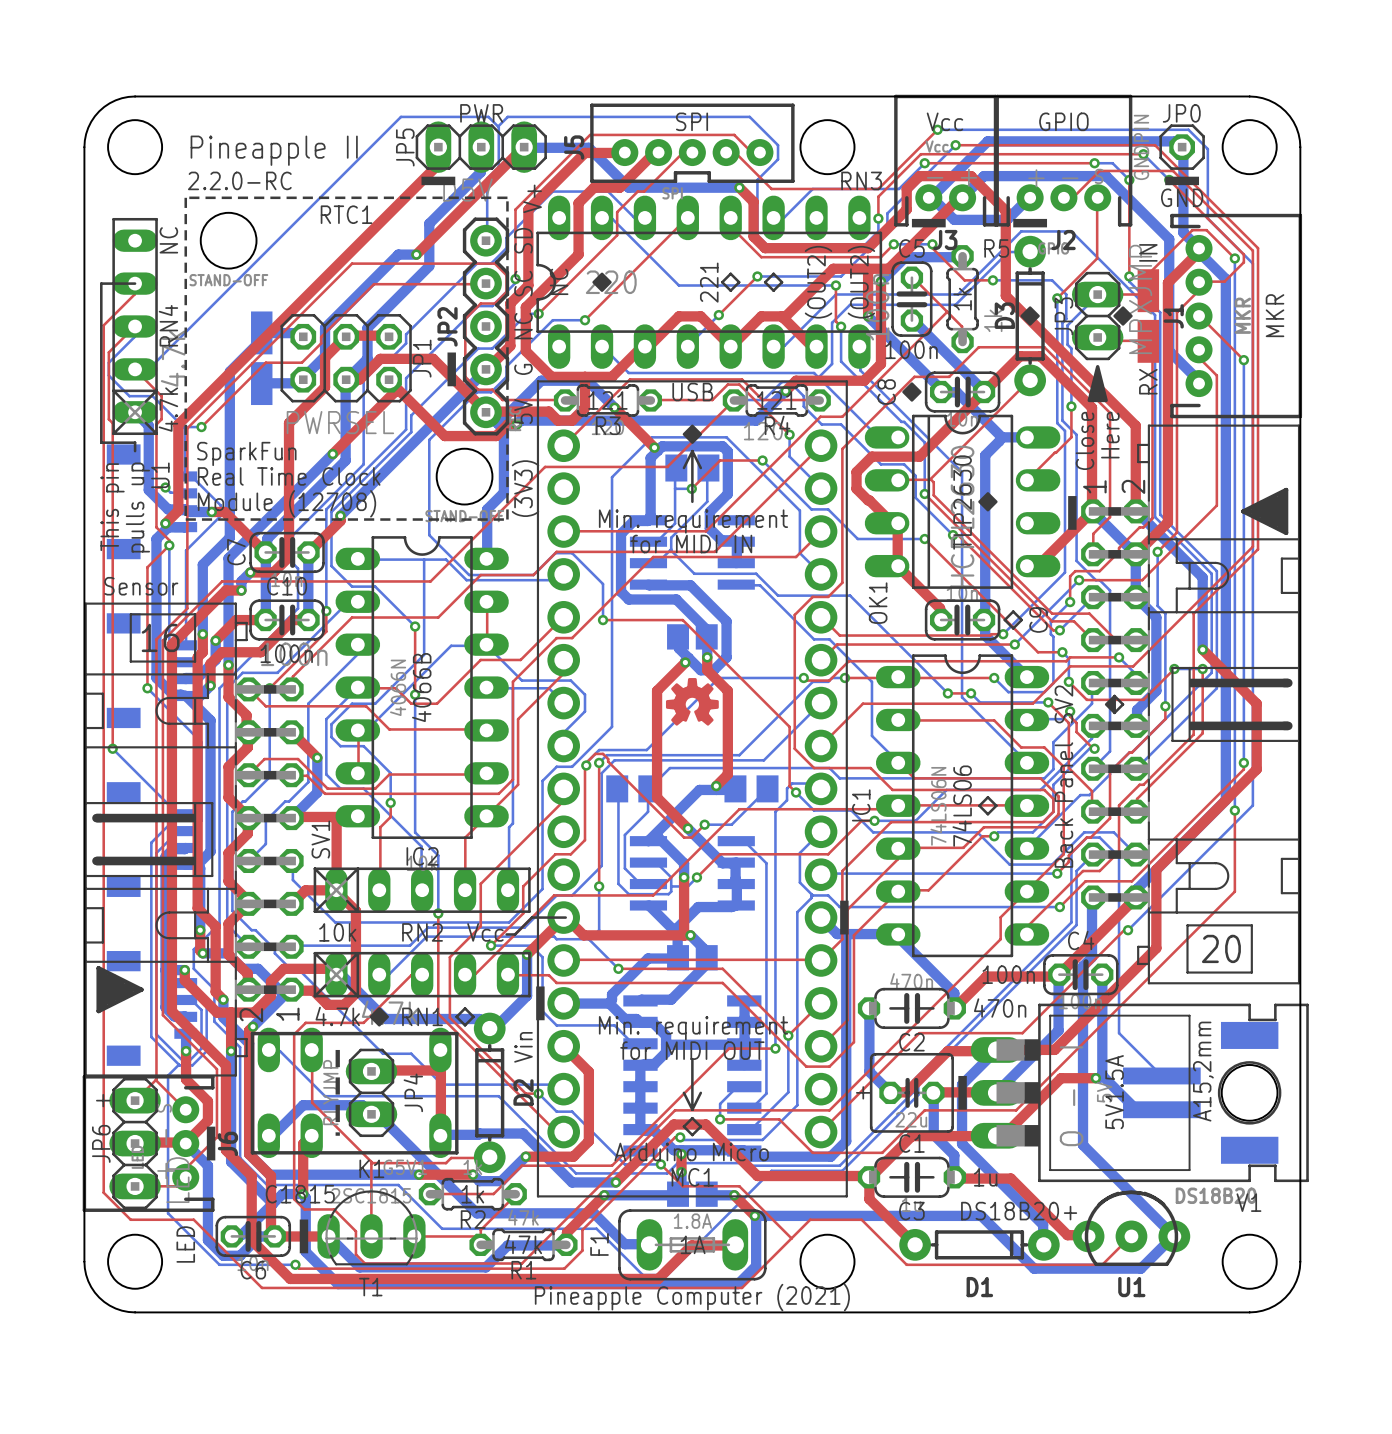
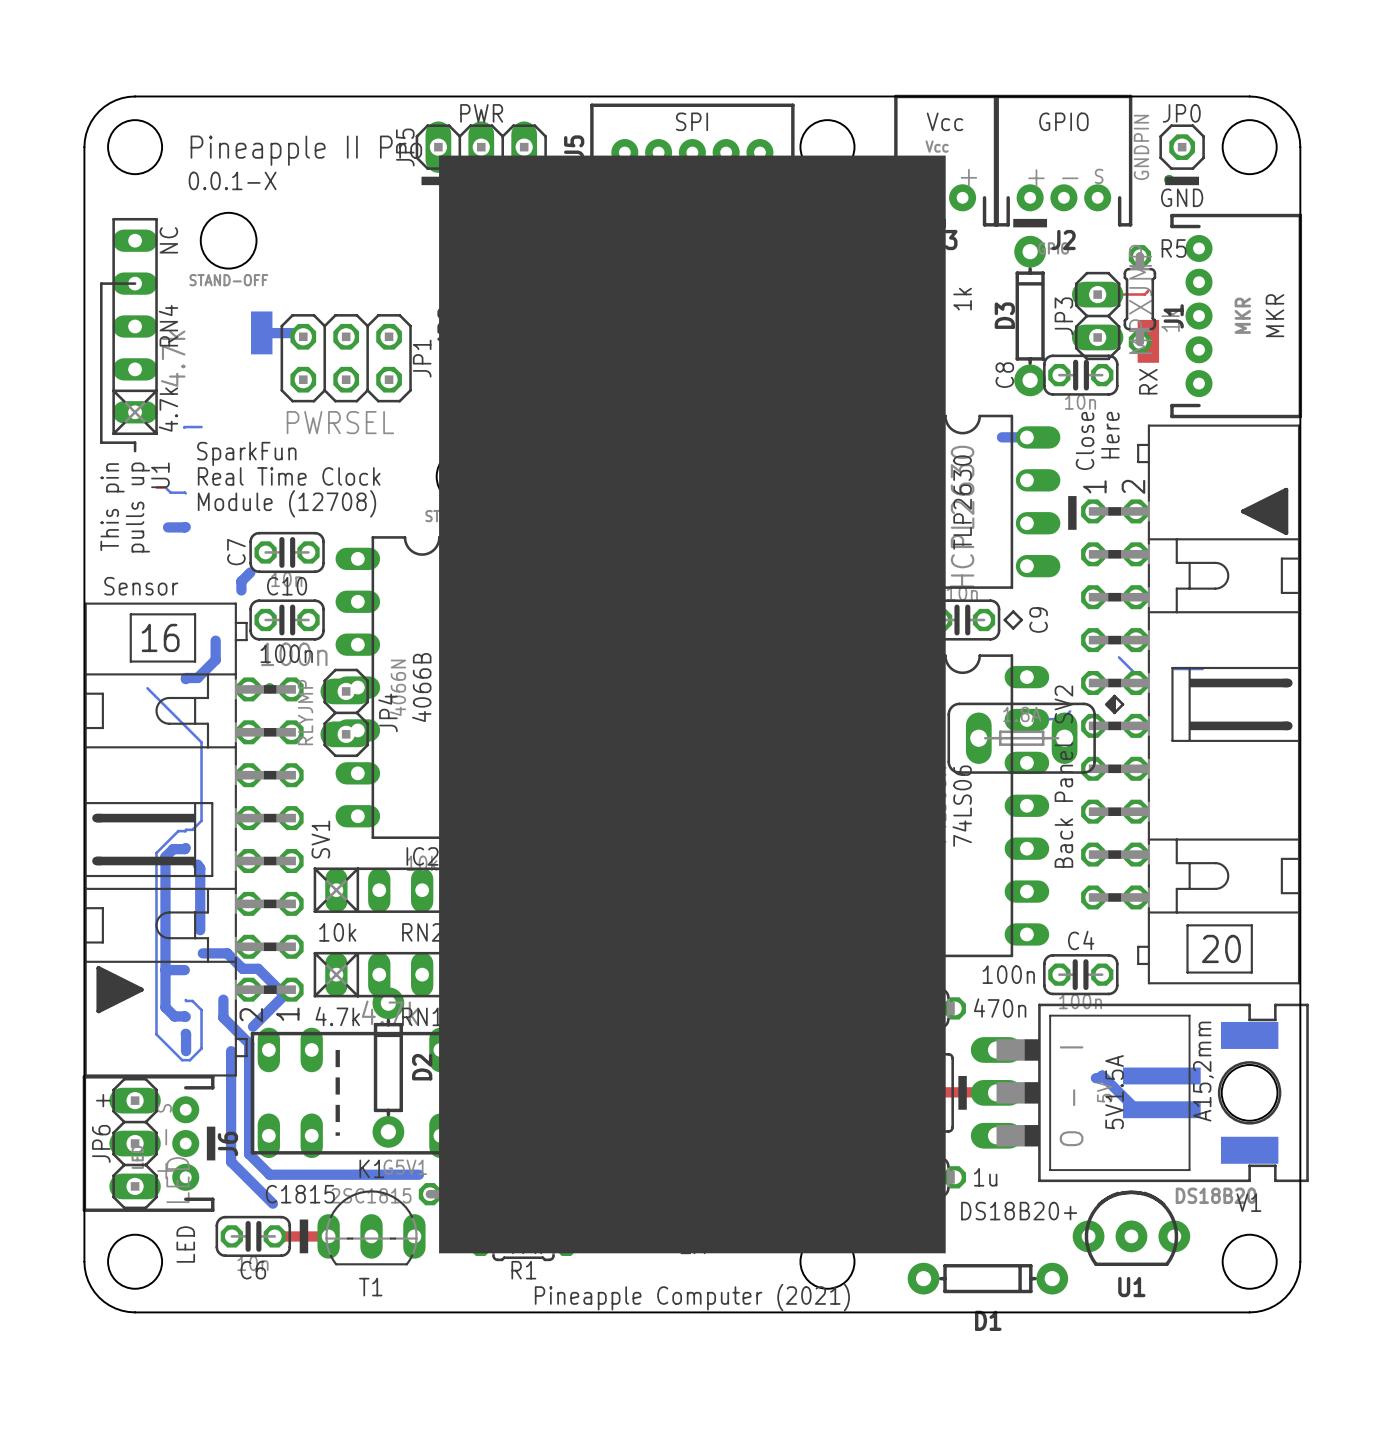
bottom track: (498, 126) (507, 116) (749, 116) (778, 145) (778, 159) (757, 179) (757, 235) (766, 244) (865, 244) (878, 231) (878, 218) -> none
top track: (937, 129) (878, 188) (771, 188) (735, 152) (726, 152) -> none
bottom track: (937, 129) (1188, 129) (1207, 149) (1207, 218) (1252, 263) (1252, 805) (1128, 930) -> none
via: (937, 129) -> none
top track: (955, 145) (1155, 145) (1258, 248) (1258, 549) (1193, 613) (1193, 734) (1143, 784) (1139, 784) (1119, 805) (1119, 851) (1099, 871) (1083, 871) (1027, 926) (1026, 934) -> none
bottom track: (955, 145) (887, 213) (887, 230) (841, 276) (757, 276) -> none
via: (955, 145) -> none
top track: (438, 147) (438, 164) (178, 424) (178, 510) (165, 523) -> none
bottom track: (481, 147) (480, 172) (429, 223) (429, 266) (367, 327) (367, 358) (346, 379) (345, 460) (267, 539) (265, 620) -> none
top track: (524, 147) (416, 254) -> none
bottom track: (524, 147) (588, 147) (628, 187) (739, 187) -> none
text: Pineapple II (274, 150) -> Pineapple II Pro (306, 150)
top track: (624, 152) (585, 152) (528, 209) (528, 285) (510, 303) (510, 345) (486, 369) -> none
top track: (658, 152) (654, 152) (619, 187) (594, 187) (578, 203) (578, 254) (525, 307) (525, 351) (551, 376) (612, 376) (640, 348) (649, 345) (678, 316) (700, 316) (730, 346) (761, 316) (781, 316) (811, 345) (816, 346) -> none
top track: (692, 152) (682, 152) (644, 191) (637, 191) (617, 212) (617, 235) (538, 313) -> none
top track: (759, 152) (751, 151) (734, 134) (590, 134) (515, 209) (515, 279) -> none
top track: (1143, 154) (920, 154) (878, 196) (878, 218) -> none
bottom track: (1143, 154) (1169, 179) -> none
via: (1143, 154) -> none
drawing: none -> [439, 155, 946, 1254]
top track: (924, 163) (1094, 163) -> none
bottom track: (924, 163) (898, 188) (812, 188) (784, 217) (773, 217) -> none
via: (924, 163) -> none
bottom track: (1094, 163) (1112, 163) (1129, 179) -> none
via: (1094, 163) -> none
top track: (1129, 179) (1129, 276) -> none
via: (1129, 179) -> none
top track: (1169, 179) (1243, 254) (1243, 262) (1224, 281) (1199, 282) (1198, 290) (1176, 312) (1176, 532) (1157, 551) -> none
text: 2.2.0-RC (239, 180) -> 0.0.1-X (232, 180)
top track: (739, 187) (753, 201) (753, 236) (765, 248) (868, 248) (906, 209) (906, 188) (919, 176) (971, 176) (1005, 210) (1005, 295) (1135, 425) (1136, 511) -> none
via: (739, 187) -> none
line: (185, 197) (507, 197) (507, 519) (185, 519) (185, 197) -> none
top track: (962, 197) (959, 197) (888, 268) (833, 268) (783, 318) -> none
bottom track: (962, 197) (983, 176) (1106, 176) (1169, 239) (1169, 351) (1198, 380) (1198, 383) -> none
bottom track: (1030, 197) (1007, 219) (954, 219) (932, 197) (928, 197) (935, 194) (987, 141) (1175, 141) (1183, 147) (1183, 232) (1198, 248) (1200, 253) (1225, 279) (1225, 800) (1137, 889) (1136, 897) -> none
top track: (1063, 197) (1074, 196) (1099, 170) (1173, 170) (1252, 250) (1252, 546) (1133, 666) (1070, 666) (1032, 703) (862, 703) (821, 745) -> none
top track: (1097, 197) (1097, 258) (1057, 298) -> none
text: RTC1 (346, 214) -> none
bottom track: (602, 217) (612, 218) (678, 285) (835, 285) -> none
bottom track: (644, 217) (633, 217) (608, 191) (552, 191) (506, 237) (506, 248) (491, 263) (476, 263) (406, 334) (406, 343) (386, 362) (381, 362) (363, 380) (363, 464) (292, 535) (292, 563) (298, 568) (298, 608) (219, 688) (219, 923) (193, 949) (193, 968) (214, 989) (214, 1021) (240, 1047) (240, 1157) (267, 1185) (398, 1185) (442, 1228) (596, 1228) (642, 1275) (667, 1275) (771, 1170) (842, 1170) (918, 1094) (918, 1083) (1076, 925) (1076, 871) (1093, 854) -> none
top track: (687, 217) (585, 320) -> none
top track: (730, 217) (731, 227) (761, 257) (880, 257) (893, 244) -> none
via: (878, 218) -> none
bottom track: (486, 240) (487, 178) (498, 167) (498, 127) (488, 116) (400, 116) (148, 369) (135, 369) -> none
via: (893, 244) -> none
top track: (932, 244) (932, 248) (964, 280) (992, 280) -> none
via: (932, 244) -> none
top track: (1199, 248) (1198, 252) (1167, 282) (1167, 522) (1136, 554) -> none
bottom track: (1030, 251) (1008, 252) (955, 304) (850, 304) (832, 322) (832, 363) (818, 377) -> none
bottom track: (416, 254) (398, 254) (325, 327) (325, 356) (300, 383) (261, 383) -> none
via: (416, 254) -> none
bottom track: (962, 256) (905, 257) (880, 281) -> none
top track: (1234, 258) (1206, 230) (1192, 230) (1148, 273) (1148, 290) -> none
bottom track: (1234, 258) (1234, 810) -> none
via: (1234, 258) -> none
top track: (868, 268) (868, 316) -> none
drawing: [592, 272, 612, 292] -> none
line: (730, 273) (722, 282) (730, 290) (739, 282) (730, 273) -> none
line: (773, 273) (765, 282) (773, 290) (782, 282) (773, 273) -> none
top track: (757, 276) (718, 315) -> none
via: (757, 276) -> none
bottom track: (1129, 276) (1129, 281) (1160, 312) (1160, 514) (1216, 571) (1216, 688) (1136, 768) -> none
via: (1129, 276) -> none
top track: (911, 277) (962, 326) (962, 342) -> none
bottom track: (515, 279) (515, 282) (492, 306) (478, 306) (406, 378) (406, 429) (326, 509) (326, 611) -> none
via: (515, 279) -> none
bottom track: (992, 280) (1052, 280) (1066, 294) (1066, 318) (1062, 322) (1062, 420) (1076, 434) (1076, 560) (1095, 580) (1099, 580) (1110, 590) (1110, 751) (1093, 768) -> none
via: (992, 280) -> none
top track: (880, 281) (880, 363) (864, 380) (796, 380) (785, 391) -> none
via: (880, 281) -> none
text: 221 (709, 282) -> none
top track: (135, 283) (134, 294) (103, 325) (103, 1192) (130, 1219) (193, 1219) (262, 1287) (742, 1287) (810, 1219) (861, 1219) (906, 1264) (1102, 1264) (1131, 1236) -> none
top track: (486, 283) (373, 284) (321, 336) (321, 343) (301, 362) (265, 362) (201, 427) -> none
top track: (835, 285) (835, 321) (841, 326) -> none
via: (835, 285) -> none
IN: (1148, 290) -> none
bottom track: (1097, 294) (1067, 325) (1067, 344) (1071, 348) (1071, 406) -> none
bottom track: (1057, 298) (1057, 423) (1065, 430) (1065, 572) (1003, 634) -> none
via: (1057, 298) -> none
R5 position: (962, 299) -> (1139, 299)
drawing: [1020, 306, 1040, 326] -> none
drawing: [1113, 306, 1133, 326] -> none
top track: (947, 311) (842, 416) (820, 416) (705, 531) (563, 531) -> none
bottom track: (538, 313) (527, 313) (492, 348) (478, 348) (411, 415) (411, 432) (331, 511) (331, 566) (352, 586) (375, 586) (415, 626) -> none
via: (538, 313) -> none
via: (718, 315) -> none
bottom track: (868, 316) (938, 387) (941, 392) (956, 392) (1001, 437) (985, 455) (985, 635) (1026, 677) -> none
top track: (1199, 316) (1243, 360) -> none
bottom track: (585, 320) (552, 320) (506, 366) (506, 376) (491, 392) (476, 392) (429, 439) (429, 535) (469, 575) (533, 575) (555, 553) (572, 553) (603, 584) (603, 620) -> none
via: (585, 320) -> none
bottom track: (911, 320) (984, 392) -> none
top track: (135, 326) (108, 352) (108, 419) (112, 423) (112, 748) -> none
bottom track: (135, 326) (134, 336) (108, 362) (108, 375) (129, 396) (152, 396) (184, 428) (184, 475) (192, 477) (220, 505) (220, 515) (186, 550) (185, 645) -> none
bottom track: (841, 326) (841, 361) (924, 442) (924, 493) -> none
via: (841, 326) -> none
bottom track: (261, 332) (260, 340) (229, 371) (229, 537) (202, 564) (202, 634) -> none
top track: (389, 336) (346, 336) (325, 357) (325, 387) (289, 423) (289, 557) (273, 572) (250, 572) -> none
top track: (1097, 337) (1101, 340) (1147, 340) (1152, 345) (1152, 518) (1143, 527) (1139, 527) (1099, 571) (1075, 571) (1070, 576) (1070, 602) -> none
bottom track: (602, 346) (628, 373) (814, 373) (878, 437) (898, 437) -> none
bottom track: (773, 346) (784, 345) (835, 294) (958, 294) (1021, 231) (1071, 231) (1155, 315) (1155, 517) (1211, 573) (1211, 672) (1110, 771) (1110, 774) (1089, 795) (1080, 795) (1026, 848) -> none
bottom track: (859, 346) (860, 370) (962, 472) (962, 697) (1026, 762) -> none
top track: (1199, 349) (1200, 358) (1216, 375) (1216, 505) (1142, 580) (1079, 580) -> none
drawing: [447, 352, 456, 387] -> none
bottom track: (1243, 360) (1243, 762) -> none
via: (1243, 360) -> none
drawing: [1087, 365, 1108, 403] -> none
top track: (135, 369) (161, 396) (161, 419) (156, 424) (156, 527) (169, 540) (169, 545) (147, 567) (147, 688) -> none
bottom track: (486, 369) (340, 515) -> none
text: G (523, 369) -> none
top track: (585, 376) (585, 407) (572, 420) (557, 420) (548, 411) (486, 412) (433, 358) (380, 358) (359, 379) (346, 379) -> none
top track: (1030, 380) (929, 479) (898, 480) -> none
part: (261, 383) -> none
bottom track: (785, 391) (756, 420) (520, 420) (516, 424) -> none
via: (785, 391) -> none
C8 position: (962, 392) -> (1080, 375)
top track: (983, 392) (919, 456) (871, 456) (856, 472) (856, 488) (892, 523) (898, 523) (897, 566) (940, 608) (941, 620) -> none
top track: (984, 392) (1019, 356) (1040, 356) (1092, 407) (1093, 511) (1037, 566) (1026, 566) -> none
top track: (565, 400) (502, 400) (492, 389) (478, 389) (465, 376) (465, 318) (480, 303) (494, 303) (506, 291) (506, 275) (494, 263) (352, 263) (187, 428) (187, 608) (156, 639) (156, 1079) (135, 1100) -> none
top track: (650, 400) (712, 400) (727, 384) (739, 384) (789, 434) -> none
top track: (733, 400) (667, 466) (545, 466) (430, 581) (222, 581) (162, 640) (162, 1015) (216, 1069) (216, 1137) (186, 1168) (185, 1177) (177, 1186) (135, 1186) -> none
bottom track: (733, 400) (763, 400) (781, 382) (789, 382) (803, 396) (803, 406) (821, 424) (841, 424) (880, 464) (904, 464) (915, 475) (915, 497) (953, 535) -> none
top track: (819, 400) (762, 400) (742, 379) (630, 379) (563, 445) -> none
top track: (1071, 406) (1071, 437) (1026, 480) -> none
via: (1071, 406) -> none
top track: (614, 407) (654, 447) -> none
bottom track: (614, 407) (587, 380) (541, 380) (498, 423) -> none
via: (614, 407) -> none
bottom track: (135, 412) (148, 425) (148, 490) (168, 509) (211, 511) -> none
bottom track: (486, 412) (503, 429) (503, 492) (487, 509) (486, 558) -> none
top track: (516, 424) (507, 424) (496, 436) (444, 436) (389, 379) (394, 392) (332, 454) -> none
drawing: [682, 424, 703, 444] -> none
via: (201, 427) -> none
bottom track: (789, 434) (789, 456) (821, 488) -> none
via: (789, 434) -> none
top track: (821, 445) (714, 551) (556, 551) (533, 575) (480, 575) (438, 617) (352, 617) (292, 676) (291, 689) -> none
via: (654, 447) -> none
line: (692, 451) (692, 501) -> none
line: (692, 451) (683, 468) -> none
line: (692, 451) (700, 468) -> none
bottom track: (332, 454) (228, 558) (228, 665) -> none
via: (332, 454) -> none
top track: (762, 460) (720, 460) (691, 488) -> none
bottom track: (762, 460) (811, 509) (828, 509) (857, 539) (924, 539) -> none
via: (762, 460) -> none
bottom track: (676, 468) (675, 523) (657, 541) (648, 541) -> none
part: (692, 468) -> none
bottom track: (708, 468) (707, 501) (671, 537) (671, 549) (658, 562) (648, 563) -> none
top track: (930, 479) (933, 482) (933, 495) (1052, 613) (1089, 613) (1115, 639) (1136, 640) -> none
via: (165, 487) -> none
bottom track: (675, 488) (691, 488) -> none
via: (691, 488) -> none
drawing: [978, 492, 998, 512] -> none
top track: (924, 493) (1052, 621) (1074, 621) (1093, 640) -> none
via: (924, 493) -> none
part: (151, 501) -> none
top track: (211, 511) (224, 511) (265, 552) -> none
via: (211, 511) -> none
bottom track: (1093, 511) (1136, 554) -> none
bottom track: (1136, 511) (1202, 577) (1202, 649) -> none
top track: (340, 515) (340, 520) (308, 552) -> none
via: (340, 515) -> none
bottom track: (165, 523) (168, 527) (156, 539) (156, 677) (173, 694) (180, 694) (196, 699) (210, 685) -> none
via: (165, 523) -> none
top track: (821, 531) (796, 557) (653, 557) (572, 638) (556, 638) (512, 681) (512, 779) (498, 793) (325, 793) (307, 775) (291, 775) -> none
top track: (953, 535) (958, 535) (1053, 630) (1059, 630) -> none
via: (953, 535) -> none
top track: (924, 539) (1037, 652) (1062, 652) -> none
via: (924, 539) -> none
bottom track: (169, 545) (169, 650) (179, 661) (185, 662) -> none
via: (169, 545) -> none
bottom track: (670, 549) (694, 573) (756, 573) (778, 595) (850, 595) (947, 693) -> none
bottom track: (1157, 551) (1157, 605) (1165, 613) (1165, 706) -> none
via: (1157, 551) -> none
bottom track: (308, 552) (308, 620) -> none
top track: (1093, 554) (1093, 533) (1110, 517) (1110, 412) (1044, 347) (978, 347) (949, 376) (914, 376) (842, 448) (842, 582) (828, 596) (812, 596) (794, 614) (794, 748) (814, 768) (870, 768) (892, 789) (1044, 789) (1053, 798) (1053, 811) (1043, 822) (891, 822) (842, 871) (842, 939) (821, 960) (563, 960) -> none
bottom track: (1135, 554) (1136, 597) (1156, 617) (1156, 690) (1137, 710) (1136, 725) -> none
bottom track: (357, 558) (446, 559) (466, 580) (557, 580) (563, 574) -> none
bottom track: (424, 559) (424, 654) (375, 703) (352, 703) (331, 724) (331, 737) (340, 746) (363, 746) (390, 773) (390, 802) -> none
bottom track: (736, 563) (736, 541) (721, 540) (709, 528) (709, 511) (727, 493) (727, 451) (722, 446) (662, 446) (650, 457) (650, 515) (648, 520) (633, 520) (621, 533) (621, 591) (628, 599) (676, 599) (705, 629) (707, 657) -> none
via: (250, 572) -> none
bottom track: (821, 574) (799, 553) (799, 510) (726, 437) (651, 437) (612, 477) (612, 726) (572, 766) (556, 766) (542, 780) (542, 889) (509, 922) (335, 922) (292, 880) (291, 860) -> none
bottom track: (1079, 580) (1014, 644) -> none
via: (1079, 580) -> none
bottom track: (648, 584) (690, 585) (726, 621) (726, 657) (713, 670) (700, 670) (678, 648) (678, 636) -> none
bottom track: (736, 584) (760, 585) (814, 639) (829, 639) (871, 681) (871, 735) (898, 762) -> none
top track: (241, 590) (225, 590) (171, 644) (171, 1011) (225, 1065) (225, 1150) (251, 1176) (251, 1240) (290, 1278) (658, 1278) (691, 1245) (735, 1244) -> none
via: (241, 590) -> none
bottom track: (1093, 597) (1059, 630) -> none
bottom track: (357, 601) (348, 602) (277, 672) (242, 672) (227, 688) (227, 925) (248, 946) -> none
top track: (486, 601) (486, 644) -> none
bottom track: (1070, 602) (1050, 621) (1050, 634) (1053, 636) (1053, 683) (1044, 692) (1008, 692) (994, 677) -> none
via: (1070, 602) -> none
top track: (326, 611) (326, 631) (269, 688) -> none
via: (326, 611) -> none
top track: (563, 617) (520, 659) (480, 659) (437, 703) (411, 703) (395, 688) (357, 687) -> none
top track: (821, 617) (839, 635) (1003, 634) -> none
top track: (265, 620) (236, 620) (215, 640) -> none
top track: (308, 620) (292, 620) (260, 652) (222, 652) (210, 663) (210, 685) -> none
top track: (603, 620) (682, 620) (789, 726) (789, 786) (796, 792) -> none
via: (603, 620) -> none
top track: (415, 626) (415, 694) -> none
via: (415, 626) -> none
via: (1059, 630) -> none
top track: (202, 634) (202, 652) (197, 657) (197, 908) (215, 926) (215, 991) (223, 999) -> none
via: (202, 634) -> none
via: (1003, 634) -> none
via: (215, 640) -> none
bottom track: (357, 644) (357, 654) (308, 703) (308, 782) (265, 820) (265, 843) (248, 860) -> none
top track: (1014, 644) (837, 644) (821, 660) -> none
via: (1014, 644) -> none
top track: (1202, 649) (1256, 703) (1256, 769) (1156, 869) (1156, 948) (1054, 1049) (996, 1049) -> none
via: (1202, 649) -> none
bottom track: (1062, 652) (1068, 658) (1068, 681) -> none
via: (1062, 652) -> none
top track: (707, 657) (707, 670) (727, 690) (727, 774) (716, 786) -> none
via: (707, 657) -> none
top track: (1119, 657) (1070, 657) (1066, 661) (848, 661) (829, 680) (806, 680) (803, 677) -> none
via: (1119, 657) -> none
top track: (563, 660) (563, 674) (518, 719) (518, 784) (465, 837) (465, 890) -> none
top track: (685, 662) (657, 690) (657, 797) (687, 828) -> none
via: (685, 662) -> none
top track: (228, 665) (228, 697) (246, 715) (246, 728) (248, 732) (247, 747) (228, 766) (228, 797) (248, 818) (247, 833) (228, 853) (228, 881) (248, 903) (228, 923) (228, 954) (247, 973) (248, 989) -> none
via: (228, 665) -> none
top track: (1174, 668) (1143, 699) (1086, 699) (1068, 681) -> none
via: (1174, 668) -> none
top track: (1202, 668) (1202, 733) (1137, 798) (1136, 811) -> none
via: (1202, 668) -> none
part: (151, 670) -> none
bottom track: (803, 677) (718, 677) (646, 750) (599, 750) (586, 762) (586, 765) -> none
via: (803, 677) -> none
top track: (844, 677) (994, 677) -> none
bottom track: (844, 677) (832, 677) (828, 681) (812, 681) (739, 755) (606, 755) (599, 762) -> none
via: (844, 677) -> none
via: (994, 677) -> none
via: (1068, 681) -> none
bottom track: (1093, 682) (1092, 703) (1053, 742) (1053, 769) (1044, 778) (839, 778) (829, 768) (669, 768) (649, 788) -> none
via: (210, 685) -> none
bottom track: (357, 687) (326, 719) (326, 774) (340, 788) (363, 788) (421, 846) (422, 890) -> none
bottom track: (486, 687) (548, 688) (563, 703) -> none
via: (147, 688) -> none
bottom track: (269, 688) (269, 777) (232, 811) (232, 910) (251, 930) (255, 930) (294, 972) (301, 972) (382, 1053) (411, 1053) (442, 1084) (559, 1084) (563, 1089) -> none
bottom track: (512, 688) (512, 823) (509, 827) (507, 890) -> none
top track: (248, 689) (265, 706) (366, 706) (389, 729) (486, 730) -> none
top track: (947, 693) (971, 693) -> none
via: (947, 693) -> none
bottom track: (971, 693) (980, 702) (1048, 702) -> none
via: (971, 693) -> none
bottom track: (415, 694) (415, 832) (438, 855) (438, 913) -> none
via: (415, 694) -> none
bottom track: (186, 696) (210, 720) (210, 851) (197, 864) (185, 864) -> none
top track: (1048, 702) (1068, 723) (1068, 768) (1092, 791) (1093, 811) -> none
via: (1048, 702) -> none
bottom track: (821, 703) (763, 760) (614, 760) (601, 773) (601, 865) (572, 895) (556, 895) (524, 927) (428, 927) (409, 945) (291, 946) -> none
top track: (1165, 706) (1165, 719) (1110, 771) (1110, 818) (1068, 855) (1068, 862) (1057, 873) -> none
via: (1165, 706) -> none
top track: (1070, 711) (1070, 716) (1076, 723) (1076, 732) (1094, 748) -> none
via: (1070, 711) -> none
top track: (898, 719) (994, 720) (1021, 747) (1044, 747) (1063, 766) (1063, 854) (1000, 917) (1000, 939) (829, 1110) (675, 1110) (521, 1263) (364, 1263) (355, 1254) (355, 1231) (334, 1209) (304, 1209) (294, 1199) (294, 1034) (305, 1022) (363, 1022) (411, 975) (422, 974) -> none
bottom track: (1093, 725) (1092, 738) (1040, 789) (946, 789) (915, 820) (874, 820) -> none
top track: (357, 730) (357, 773) -> none
bottom track: (357, 730) (367, 729) (451, 645) (486, 644) (521, 680) (570, 680) (585, 694) (585, 711) (564, 732) (563, 745) -> none
top track: (291, 732) (317, 757) -> none
bottom track: (112, 748) (178, 814) (185, 814) (179, 814) (151, 842) (151, 1037) (179, 1065) (192, 1065) (206, 1051) (206, 998) (192, 984) (185, 983) -> none
via: (112, 748) -> none
bottom track: (1094, 748) (1089, 748) (1053, 784) (1053, 811) (1032, 832) (998, 832) (994, 836) -> none
via: (1094, 748) -> none
bottom track: (317, 757) (317, 792) (291, 818) -> none
via: (317, 757) -> none
top track: (599, 762) (599, 886) -> none
via: (599, 762) -> none
top track: (898, 762) (914, 778) (1040, 778) (1058, 796) (1058, 814) (1045, 827) (983, 827) (963, 847) (898, 847) (897, 859) (847, 909) (847, 1020) (821, 1046) -> none
top track: (1243, 762) (1243, 769) (1131, 881) (1085, 881) (1059, 907) -> none
via: (1243, 762) -> none
via: (586, 765) -> none
top track: (486, 773) (389, 774) (375, 788) (327, 788) (298, 759) (264, 759) (248, 775) -> none
via: (716, 786) -> none
top track: (563, 788) (563, 801) (480, 883) (480, 926) (449, 957) (449, 1017) (525, 1093) (538, 1093) -> none
bottom track: (617, 788) (618, 883) (628, 894) (668, 894) (671, 891) (671, 877) (657, 863) (648, 862) -> none
part: (633, 788) -> none
bottom track: (649, 788) (648, 811) (624, 834) (624, 868) (640, 883) (648, 884) -> none
part: (692, 788) -> none
bottom track: (735, 788) (699, 789) (648, 841) (658, 837) (684, 863) (684, 877) -> none
part: (751, 788) -> none
bottom track: (767, 788) (731, 824) (704, 824) -> none
bottom track: (821, 788) (815, 783) (792, 783) (787, 788) (787, 800) (775, 811) (775, 1048) -> none
bottom track: (796, 792) (814, 810) (851, 810) (873, 832) (977, 832) (1009, 864) (1052, 864) (1084, 832) (1113, 832) (1136, 854) -> none
via: (796, 792) -> none
line: (987, 797) (979, 805) (987, 814) (996, 805) (987, 797) -> none
top track: (390, 802) (390, 816) (380, 827) (379, 890) -> none
via: (390, 802) -> none
top track: (1026, 805) (898, 805) (895, 809) (739, 809) (653, 895) (554, 895) (475, 973) (465, 974) -> none
top track: (1234, 810) (1234, 891) (1016, 1110) (924, 1110) (882, 1152) (812, 1152) (779, 1119) (720, 1119) -> none
via: (1234, 810) -> none
top track: (291, 818) (357, 816) (336, 820) (336, 890) -> none
top track: (874, 820) (861, 820) (828, 854) (720, 854) (696, 877) -> none
via: (874, 820) -> none
top track: (704, 824) (691, 837) (684, 837) (608, 761) (603, 753) (595, 753) (585, 764) (585, 840) (570, 854) (555, 854) (523, 886) (523, 913) (491, 945) -> none
via: (704, 824) -> none
bottom track: (687, 828) (722, 863) (736, 862) (736, 904) (731, 907) (698, 907) (674, 930) -> none
via: (687, 828) -> none
bottom track: (821, 831) (799, 853) (799, 882) (812, 895) (828, 895) (839, 907) (1059, 907) -> none
top track: (994, 836) (982, 836) (928, 890) (898, 890) (853, 935) (853, 1042) (829, 1066) (806, 1066) (722, 982) (556, 982) (548, 975) (507, 974) -> none
via: (994, 836) -> none
part: (151, 839) -> none
bottom track: (736, 841) (744, 841) (766, 863) (766, 1093) (752, 1107) (744, 1108) -> none
bottom track: (1057, 873) (821, 874) -> none
via: (1057, 873) -> none
top track: (684, 877) (684, 935) -> none
via: (684, 877) -> none
bottom track: (696, 877) (687, 886) (671, 886) -> none
via: (696, 877) -> none
bottom track: (599, 886) (599, 930) (589, 939) -> none
via: (599, 886) -> none
top track: (336, 890) (305, 890) (291, 903) -> none
top track: (336, 890) (355, 910) (355, 993) (344, 1004) (327, 1004) (313, 990) (291, 989) -> none
bottom track: (812, 894) (811, 898) (797, 912) (797, 1105) (762, 1139) (682, 1139) (680, 1137) -> none
bottom track: (1093, 897) (1092, 957) (1083, 966) (1083, 1145) (1174, 1236) (1140, 1268) (1034, 1268) (981, 1215) (754, 1215) (756, 1266) (738, 1284) (337, 1284) (305, 1251) (305, 1197) (303, 1194) (282, 1194) (241, 1235) (231, 1236) -> none
top track: (1136, 897) (1059, 974) (1054, 976) (986, 976) (954, 1008) -> none
drawing: [840, 900, 849, 935] -> none
bottom track: (648, 905) (677, 934) (678, 957) (648, 958) (612, 994) (609, 1003) -> none
via: (1059, 907) -> none
top track: (438, 913) (438, 1013) (555, 1130) (563, 1132) -> none
via: (438, 913) -> none
bottom track: (821, 917) (837, 934) (897, 934) (900, 939) (954, 993) (954, 1008) -> none
top track: (200, 930) (200, 950) (202, 953) -> none
via: (200, 930) -> none
top track: (1128, 930) (1124, 930) (1022, 1033) (919, 1033) (821, 1132) -> none
via: (1128, 930) -> none
bottom track: (846, 934) (846, 1141) (830, 1156) (748, 1156) (743, 1150) (673, 1150) (654, 1130) (640, 1129) (640, 1065) -> none
top track: (690, 935) (583, 935) (563, 917) (527, 954) -> none
bottom track: (690, 935) (704, 949) (705, 964) (671, 999) (640, 1000) -> none
via: (690, 935) -> none
bottom track: (491, 945) (530, 945) (542, 957) (542, 1011) (556, 1025) (614, 1025) (632, 1043) (640, 1043) -> none
via: (491, 945) -> none
via: (202, 953) -> none
bottom track: (527, 954) (527, 995) (494, 1028) (488, 1028) (479, 1019) (385, 1019) (341, 975) (336, 974) -> none
via: (527, 954) -> none
top track: (618, 968) (722, 968) (788, 1035) (821, 1003) -> none
bottom track: (618, 968) (588, 939) (556, 939) (554, 936) (426, 936) (389, 973) (379, 974) -> none
via: (618, 968) -> none
top track: (184, 970) (184, 980) (216, 1012) (254, 1012) (271, 995) (271, 981) (283, 968) (330, 968) (336, 974) -> none
via: (184, 970) -> none
bottom track: (1059, 974) (1058, 1030) (996, 1092) -> none
bottom track: (1102, 974) (1102, 1075) -> none
drawing: [536, 986, 545, 1021] -> none
via: (223, 999) -> none
bottom track: (563, 1003) (609, 1003) -> none
bottom track: (609, 1003) (624, 1019) (636, 1019) (641, 1022) (653, 1022) (666, 1035) (666, 1052) (654, 1064) (640, 1065) -> none
drawing: [369, 1007, 389, 1027] -> none
part: (151, 1008) -> none
bottom track: (869, 1008) (869, 1071) (890, 1092) -> none
top track: (231, 1012) (231, 1051) -> none
top track: (252, 1026) (249, 1030) (249, 1154) (271, 1176) (271, 1232) (274, 1236) -> none
via: (252, 1026) -> none
bottom track: (788, 1035) (788, 1092) (752, 1128) (744, 1129) -> none
via: (788, 1035) -> none
bottom track: (744, 1043) (666, 1044) -> none
top track: (563, 1046) (588, 1071) (588, 1141) (573, 1156) (525, 1156) -> none
top track: (775, 1048) (729, 1048) (612, 1165) (521, 1165) (493, 1194) (429, 1194) -> none
via: (775, 1048) -> none
bottom track: (268, 1049) (280, 1051) (325, 1096) (498, 1096) (575, 1173) (667, 1173) (677, 1163) (740, 1163) (743, 1165) (839, 1165) (913, 1092) (913, 1080) (1071, 922) (1071, 853) (1086, 837) (1099, 837) (1119, 856) (1119, 1033) (1161, 1075) -> none
top track: (311, 1049) (312, 1102) (371, 1161) (371, 1236) -> none
top track: (996, 1049) (947, 1051) (906, 1092) (890, 1092) -> none
bottom track: (996, 1049) (962, 1084) (962, 1143) (1043, 1224) (1043, 1244) -> none
top track: (186, 1051) (186, 1079) (207, 1101) (207, 1120) (185, 1143) (135, 1143) -> none
via: (186, 1051) -> none
via: (231, 1051) -> none
line: (692, 1059) (692, 1109) -> none
bottom track: (179, 1064) (168, 1075) (168, 1213) (219, 1264) (295, 1264) -> none
top track: (371, 1071) (437, 1070) (440, 1049) (440, 1135) -> none
top track: (1095, 1078) (1061, 1078) (1007, 1132) (1000, 1132) (995, 1136) (911, 1136) (869, 1177) -> none
via: (1095, 1078) -> none
top track: (155, 1080) (185, 1109) -> none
bottom track: (744, 1086) (736, 1087) (720, 1103) (720, 1119) -> none
JP4 position: (371, 1092) -> (346, 712)
D2 position: (489, 1092) -> (388, 1067)
line: (683, 1092) (692, 1109) -> none
line: (700, 1092) (692, 1109) -> none
bottom track: (933, 1092) (933, 1134) (954, 1155) (954, 1177) -> none
bottom track: (538, 1093) (556, 1111) (572, 1111) (624, 1164) (660, 1164) -> none
via: (538, 1093) -> none
bottom track: (371, 1114) (362, 1105) (303, 1105) (273, 1134) (268, 1135) -> none
bottom track: (371, 1114) (379, 1115) (476, 1213) (594, 1213) (624, 1244) (649, 1244) -> none
line: (692, 1118) (683, 1126) (692, 1135) (700, 1126) (692, 1118) -> none
via: (720, 1119) -> none
top track: (311, 1135) (303, 1143) (303, 1194) -> none
bottom track: (440, 1135) (523, 1133) (572, 1182) (615, 1182) -> none
top track: (680, 1137) (675, 1137) (582, 1230) (582, 1250) (564, 1268) (299, 1268) (295, 1264) -> none
via: (680, 1137) -> none
bottom track: (185, 1143) (207, 1165) (207, 1240) (223, 1255) (240, 1255) (259, 1236) (274, 1236) -> none
top track: (681, 1154) (681, 1172) -> none
via: (681, 1154) -> none
bottom track: (525, 1156) (501, 1181) (479, 1181) (473, 1174) -> none
via: (525, 1156) -> none
top track: (489, 1157) (451, 1157) (446, 1163) (371, 1163) -> none
top track: (660, 1164) (682, 1186) (739, 1186) (791, 1238) -> none
via: (660, 1164) -> none
bottom track: (681, 1172) (681, 1190) (677, 1195) (604, 1195) -> none
via: (681, 1172) -> none
top track: (418, 1174) (473, 1174) -> none
via: (418, 1174) -> none
via: (473, 1174) -> none
top track: (869, 1177) (869, 1199) (915, 1244) -> none
top track: (869, 1177) (757, 1176) (705, 1124) (673, 1124) (615, 1182) -> none
top track: (954, 1177) (1010, 1178) (1067, 1235) (1088, 1236) -> none
via: (615, 1182) -> none
via: (303, 1194) -> none
top track: (515, 1194) (480, 1230) (480, 1244) (480, 1244) (480, 1236) (415, 1236) (414, 1236) -> none
top track: (604, 1195) (566, 1232) (566, 1244) -> none
via: (604, 1195) -> none
top track: (734, 1195) (754, 1215) -> none
via: (734, 1195) -> none
via: (754, 1215) -> none
bottom track: (328, 1236) (359, 1267) (485, 1267) (507, 1245) (566, 1244) -> none
F1 position: (692, 1244) -> (1021, 738)
D1 position: (979, 1244) -> (987, 1278)
via: (295, 1264) -> none

